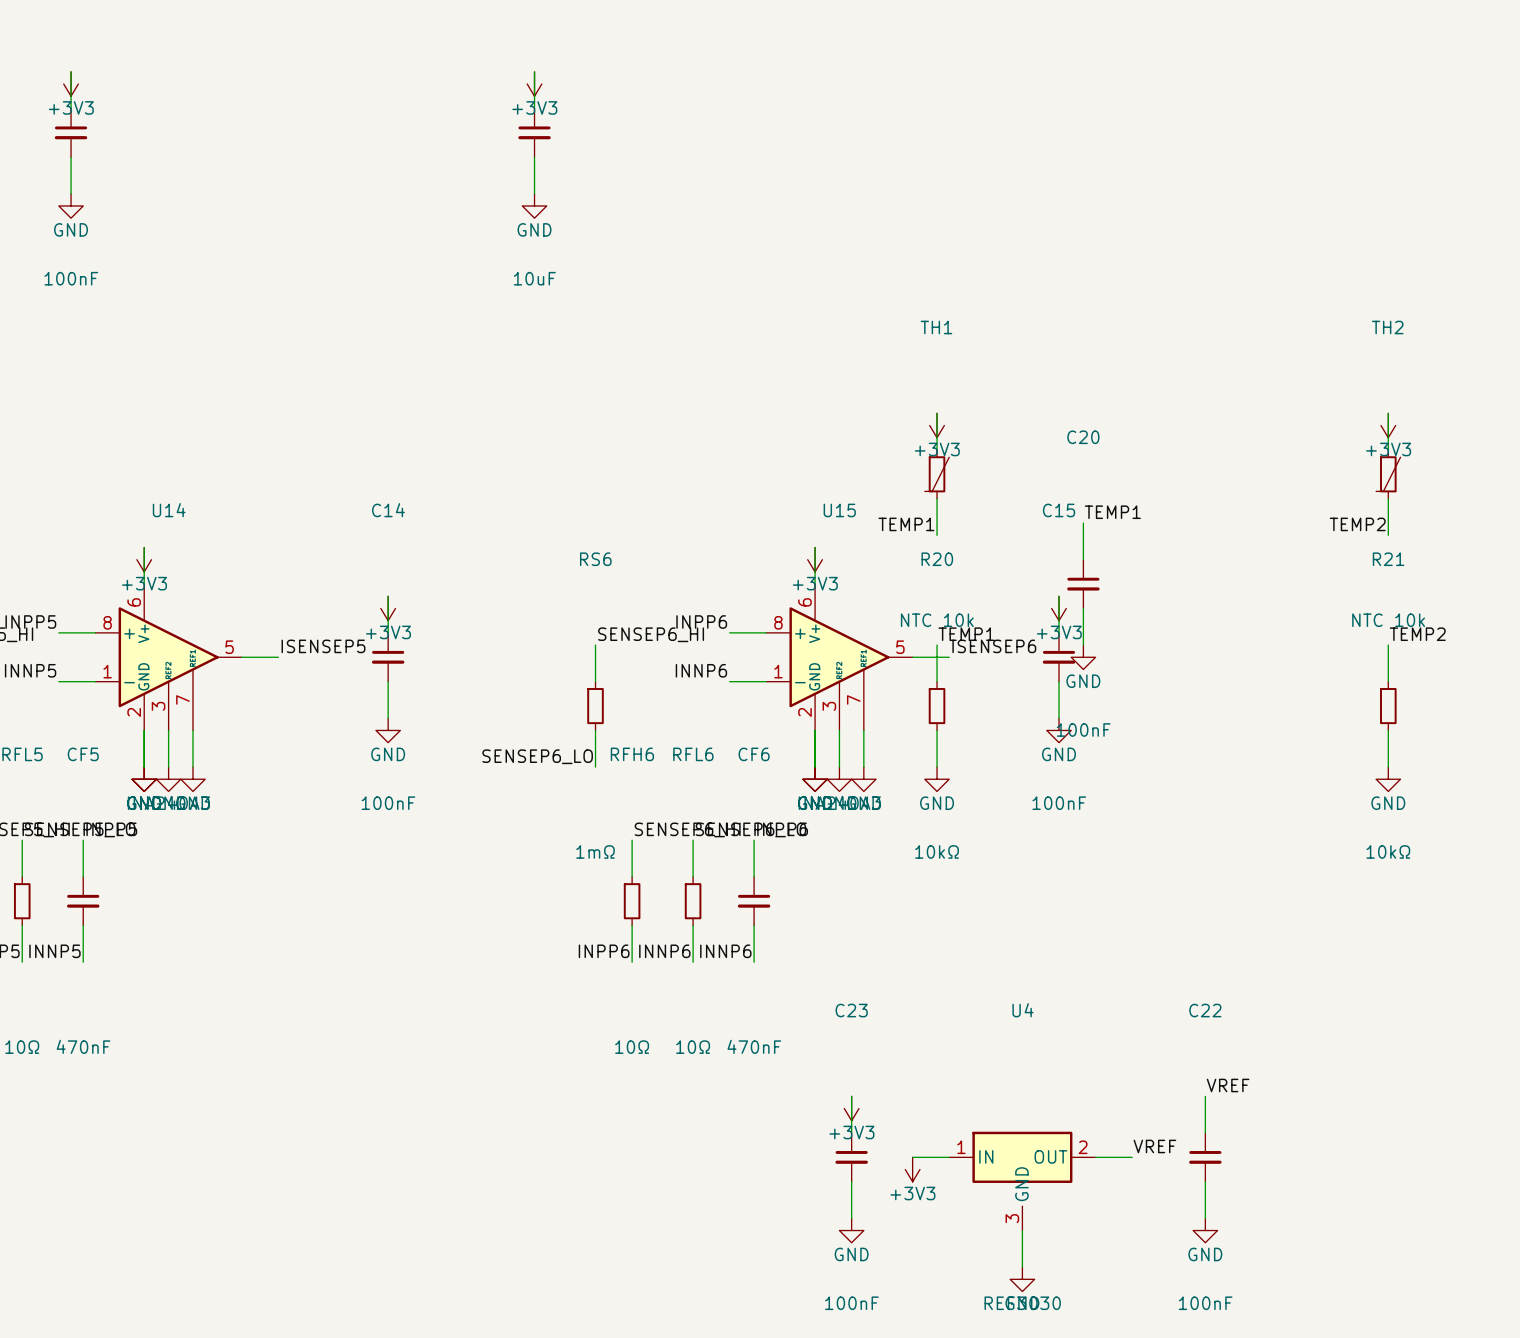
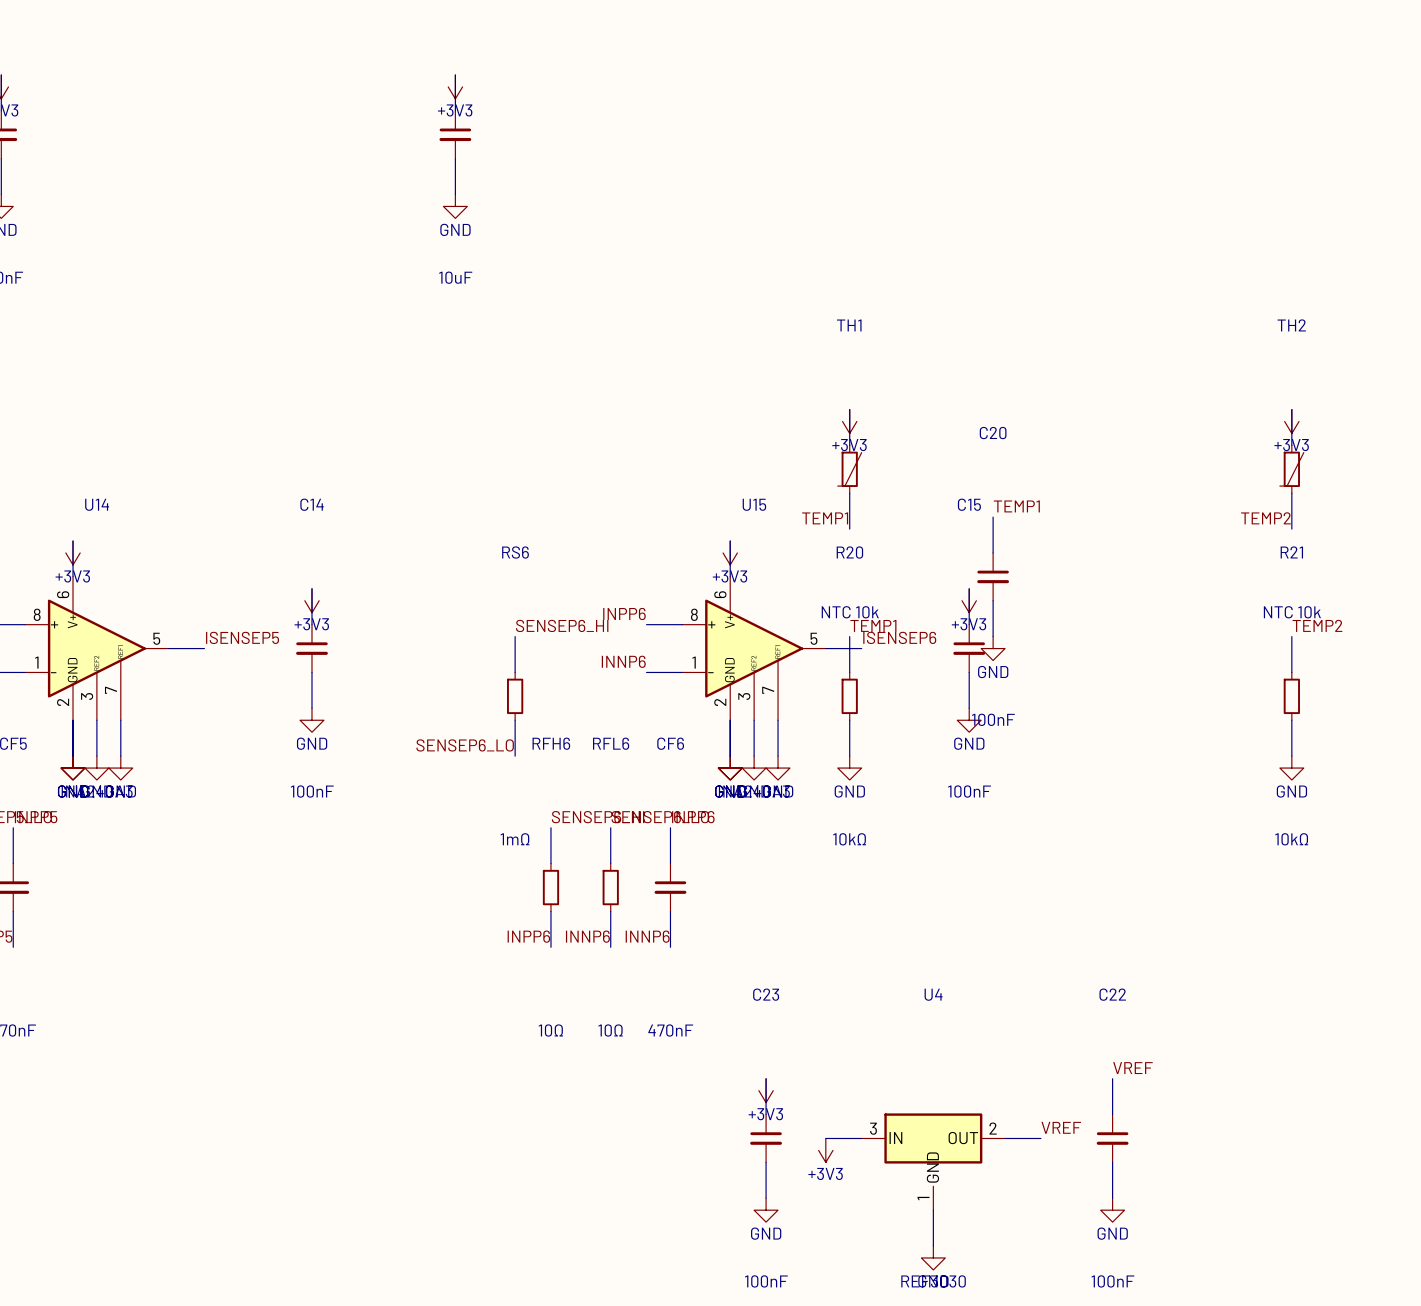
U4 pin number: 1 (961, 1147) -> 3 (873, 1128)
U4 pin number: 3 (1012, 1218) -> 1 (923, 1198)

